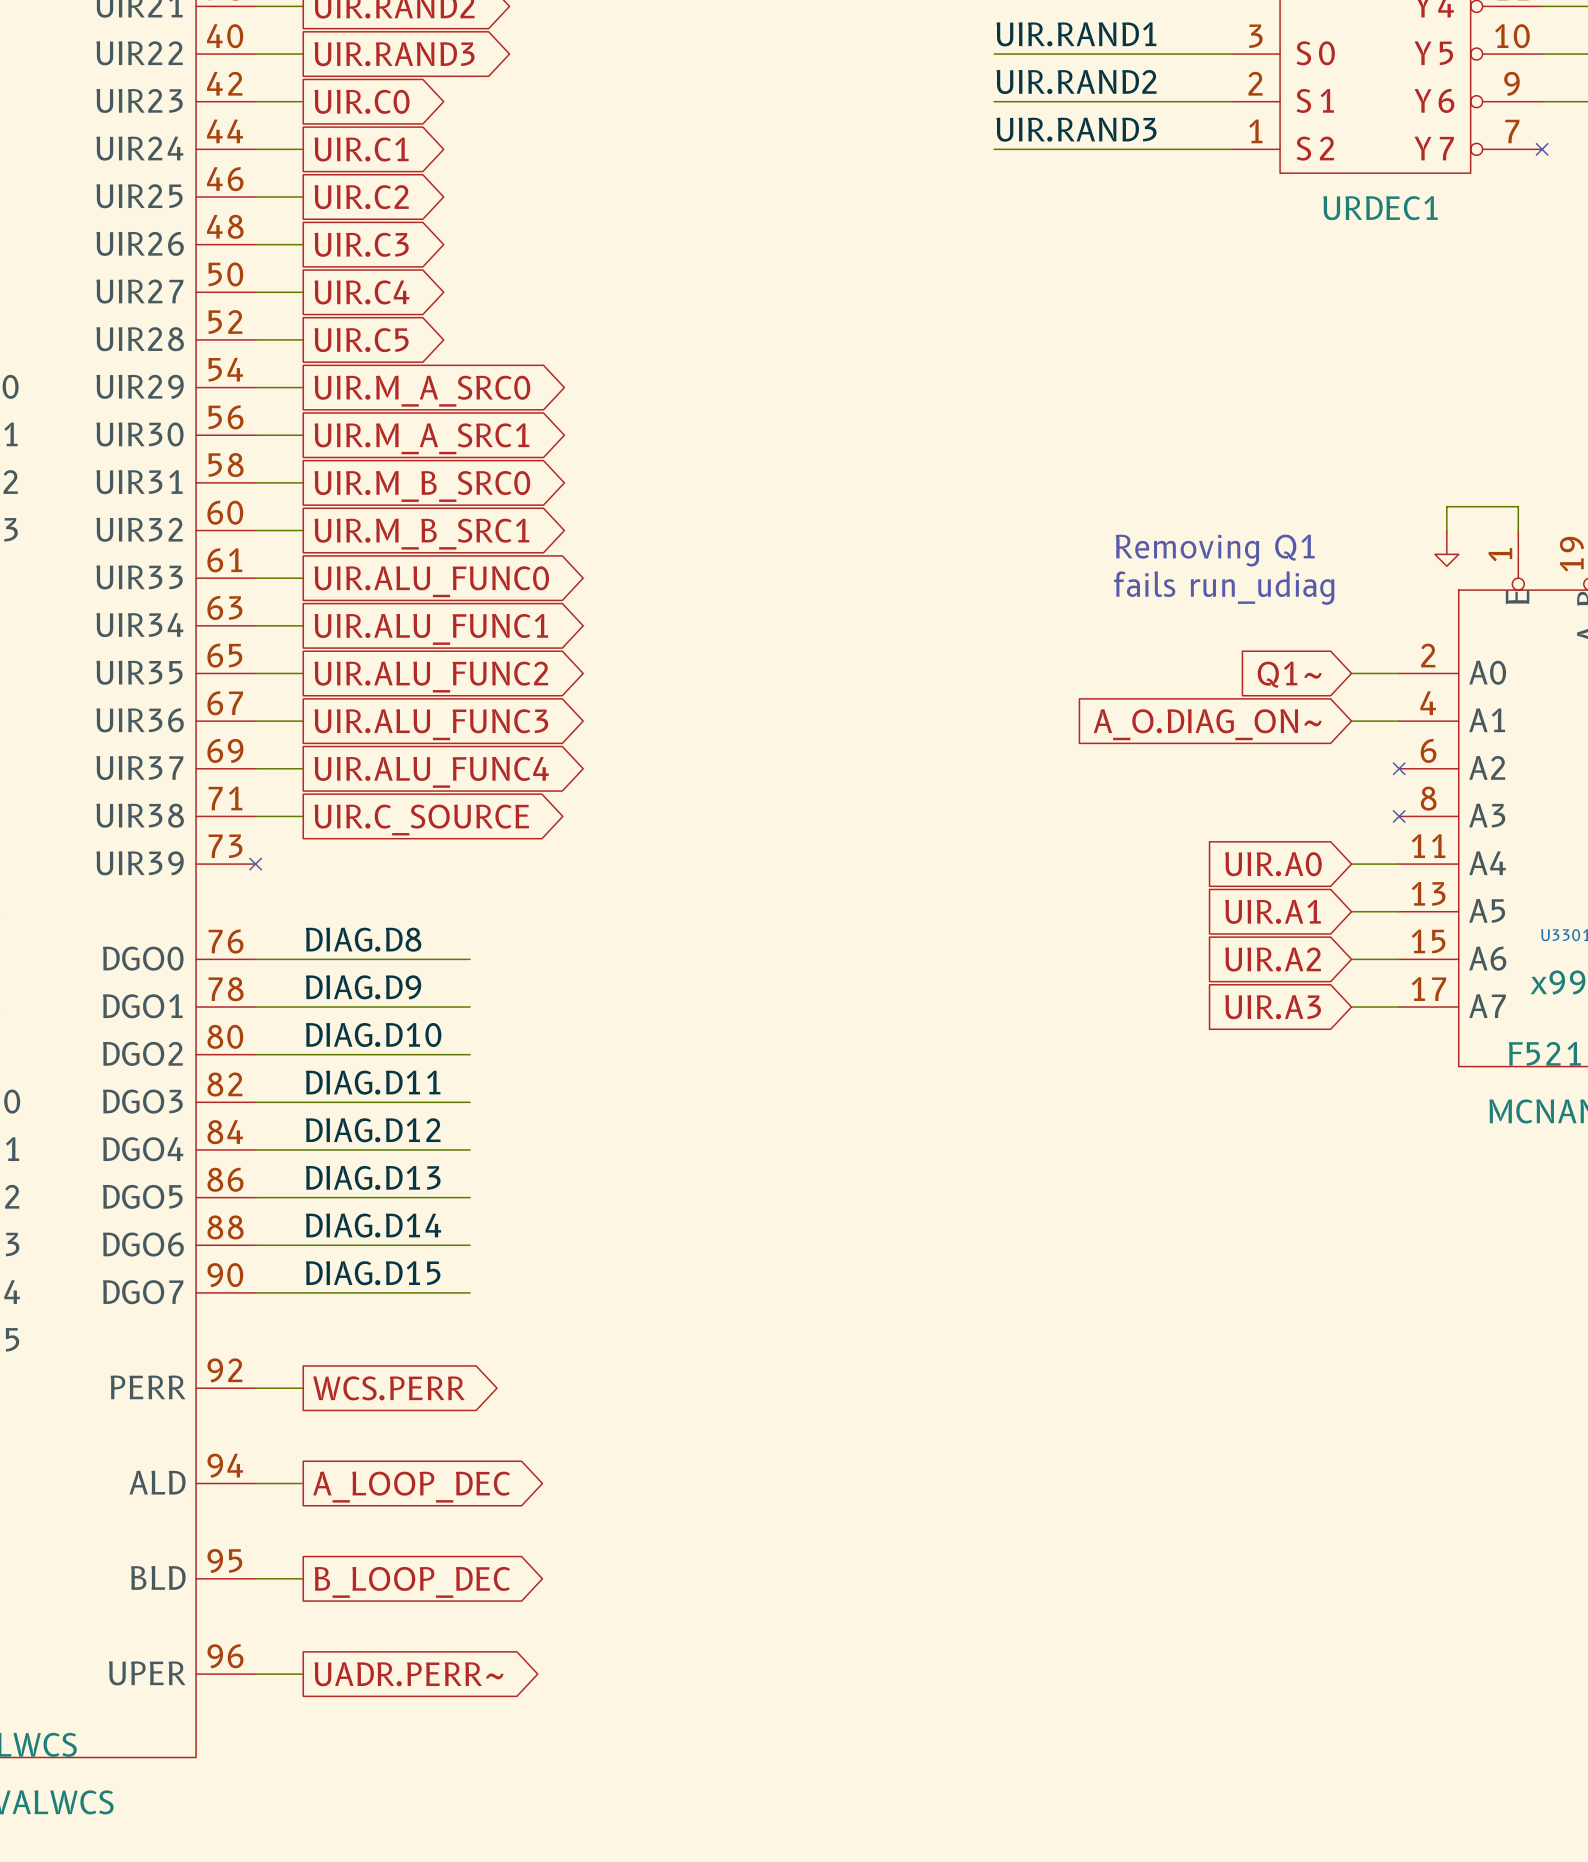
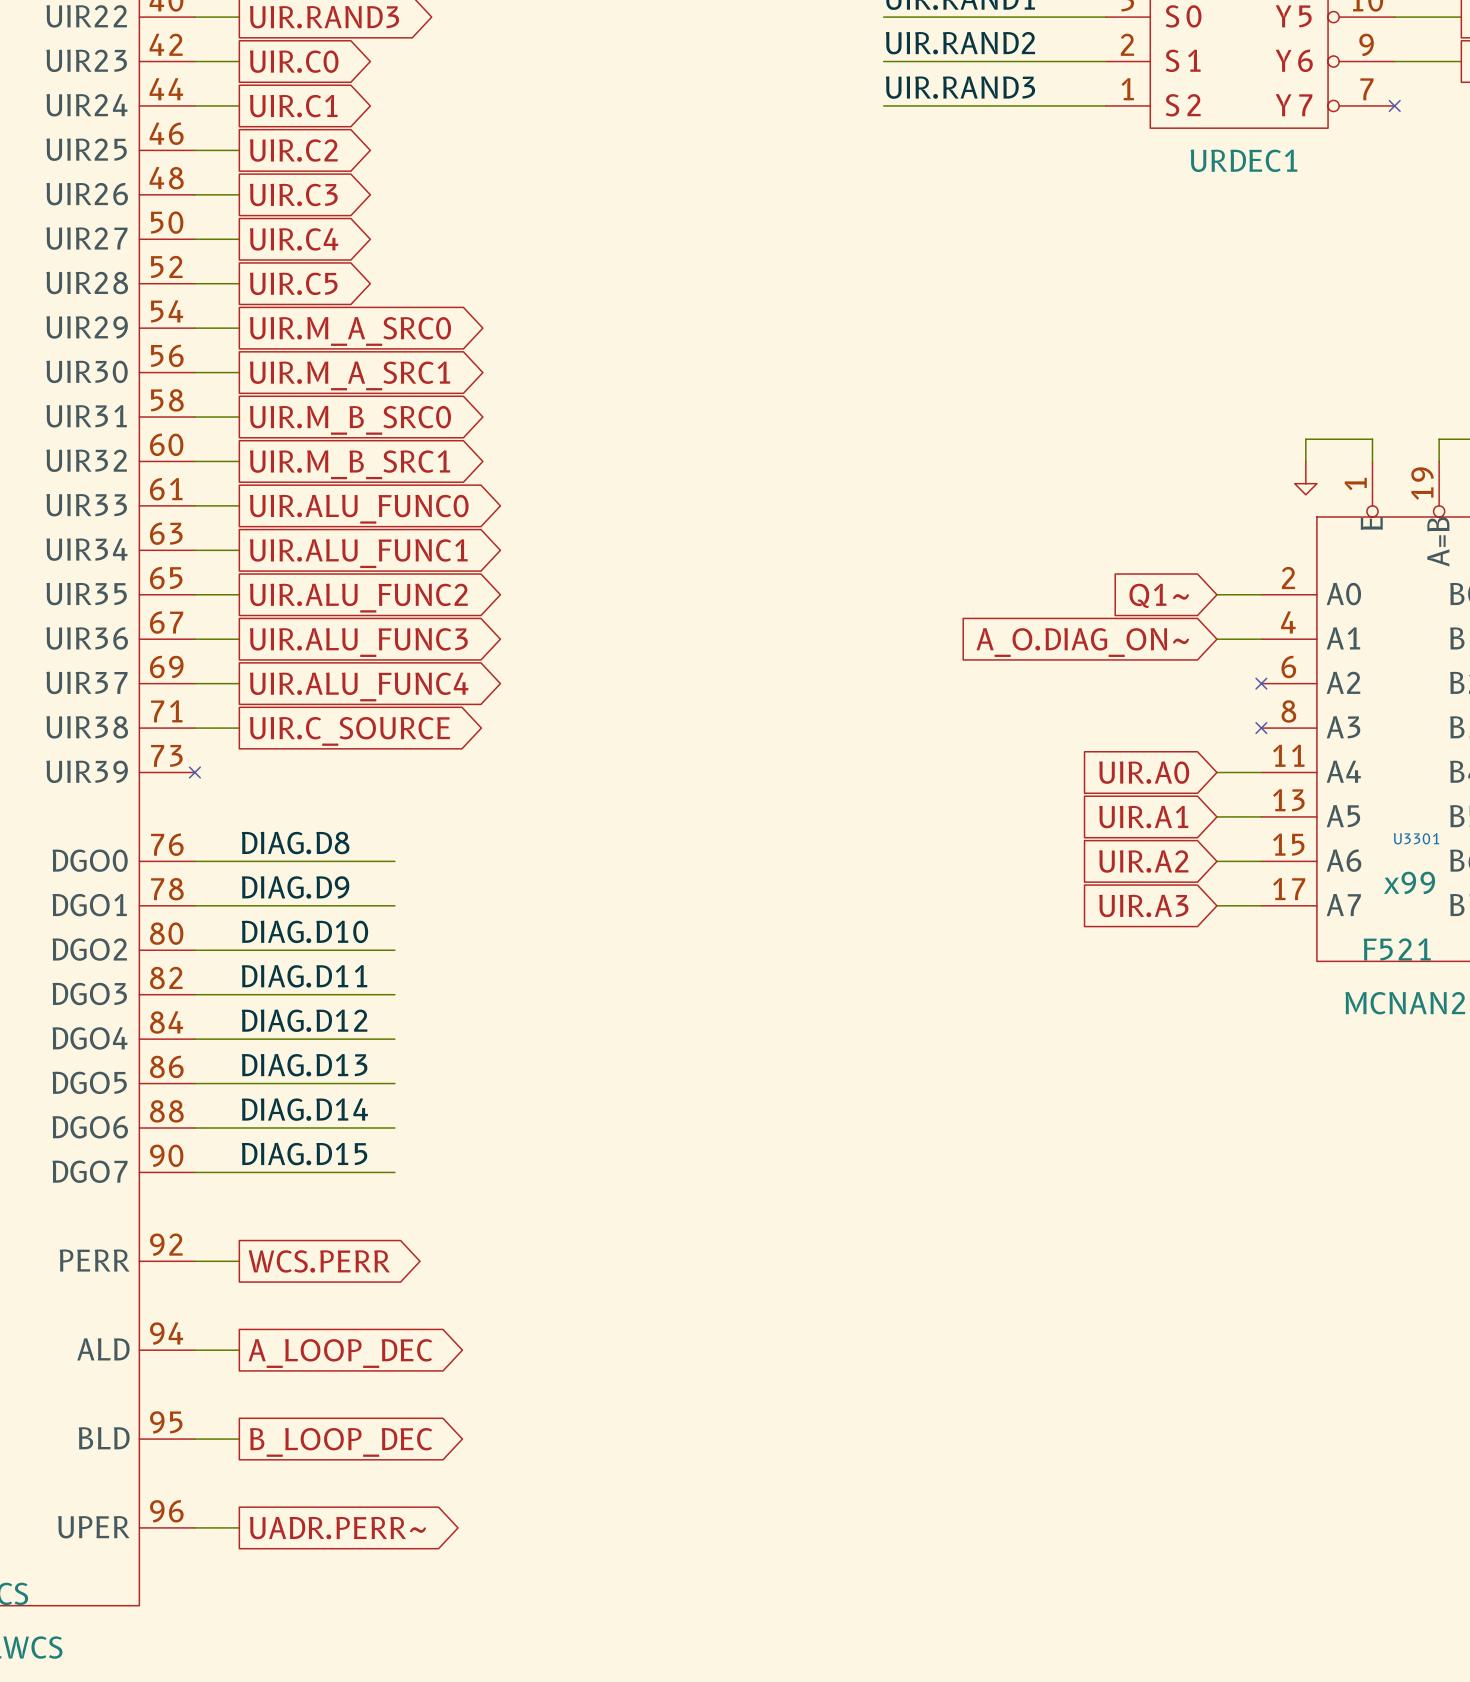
text: Removing Q1 (1215, 550) -> none
text: fails run_udiag (1224, 588) -> none

